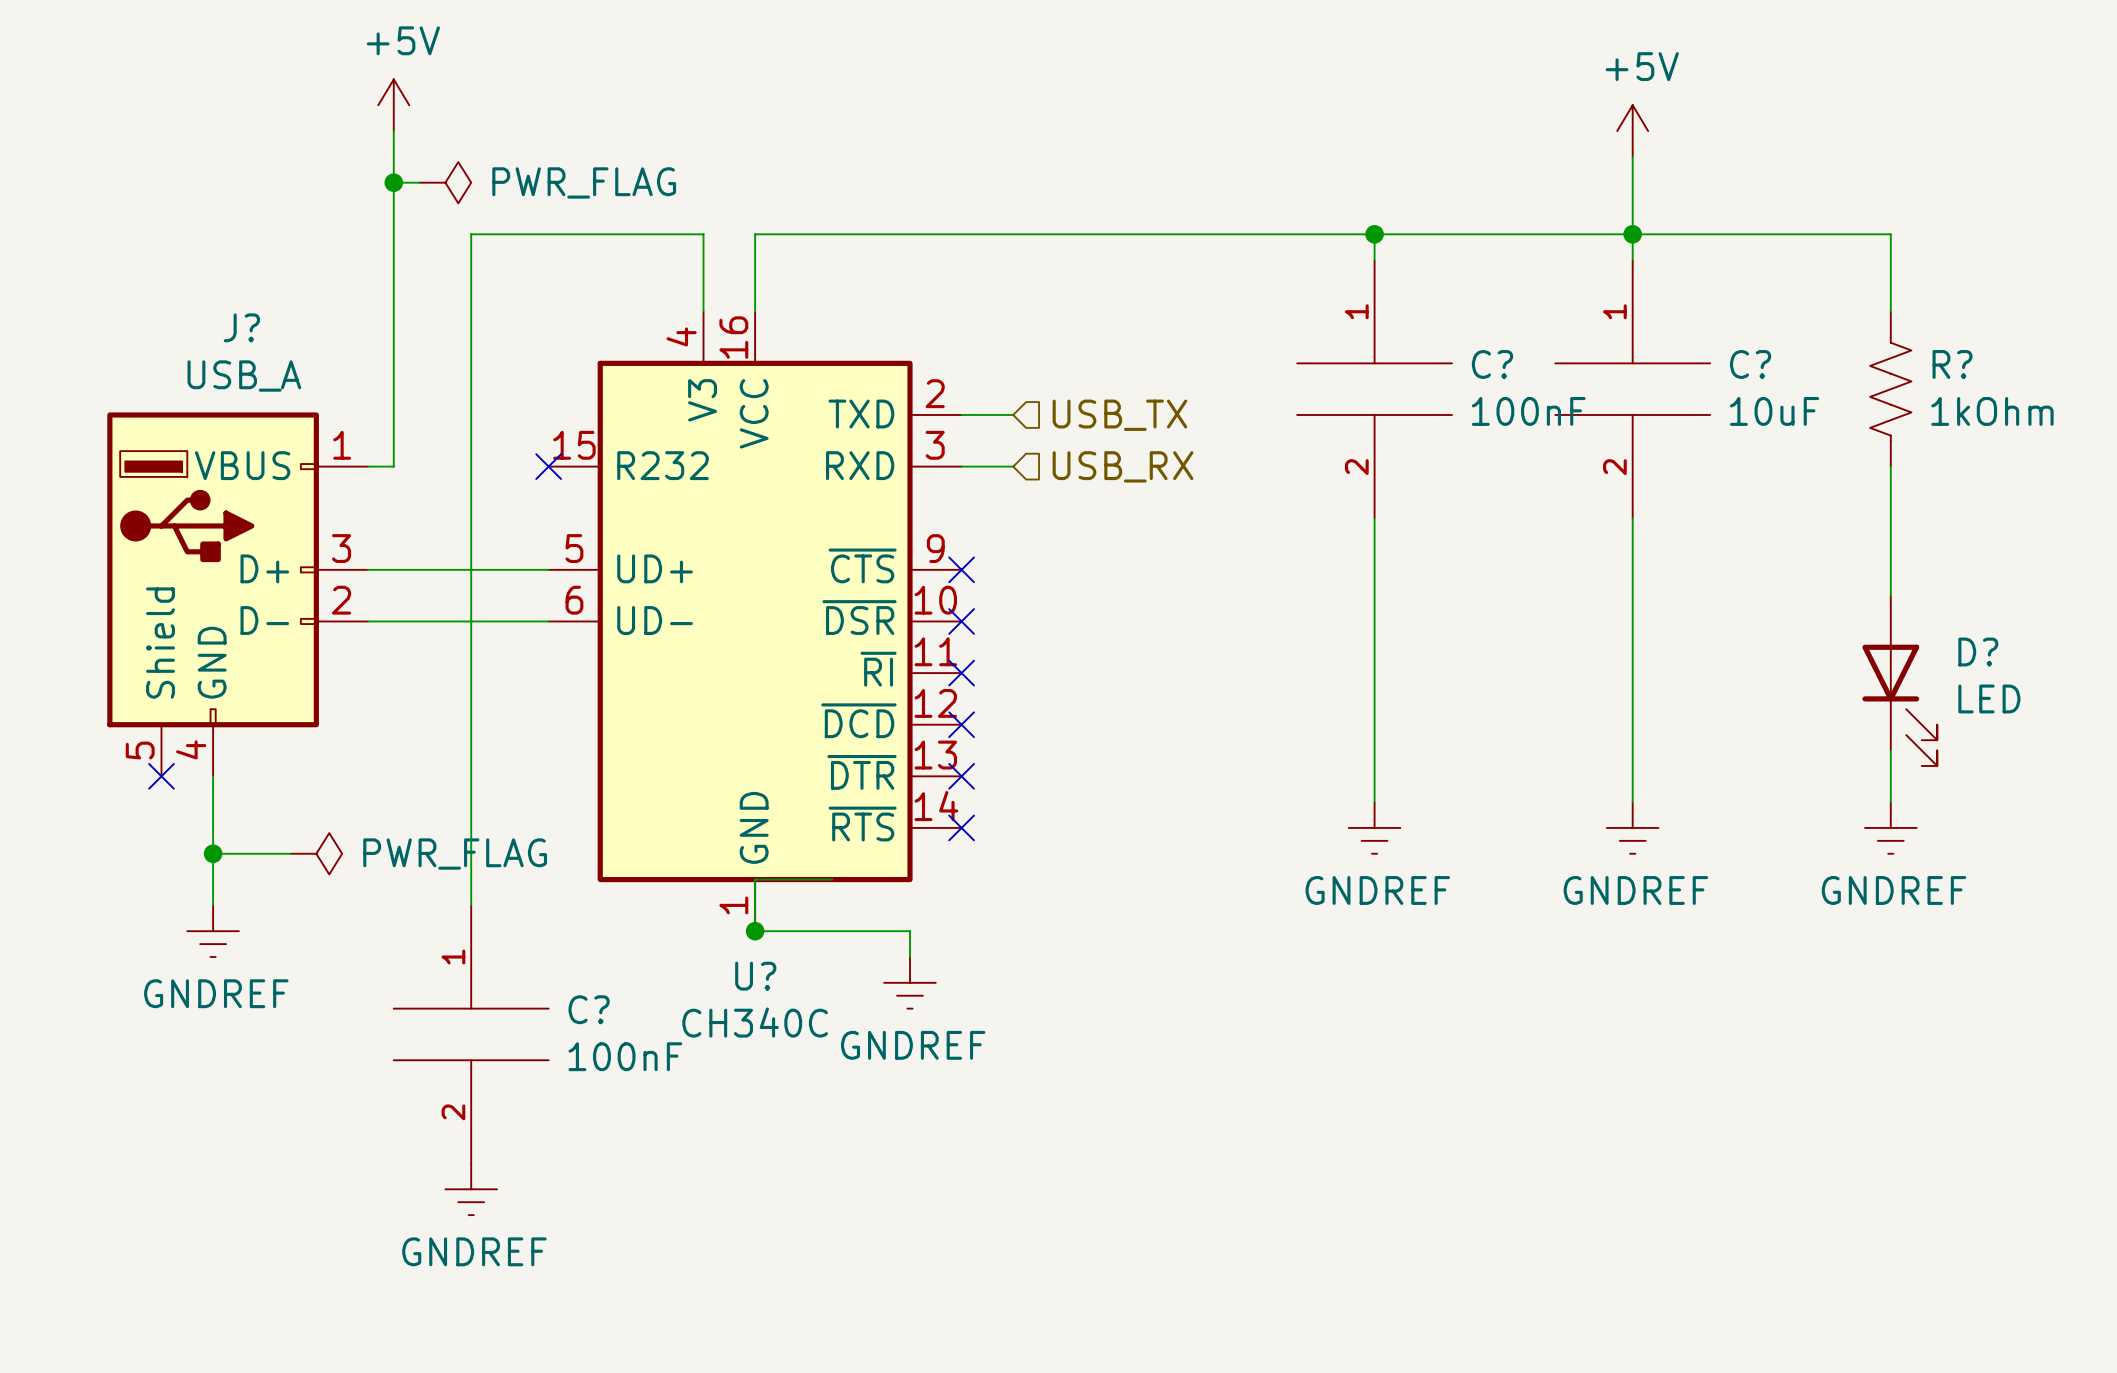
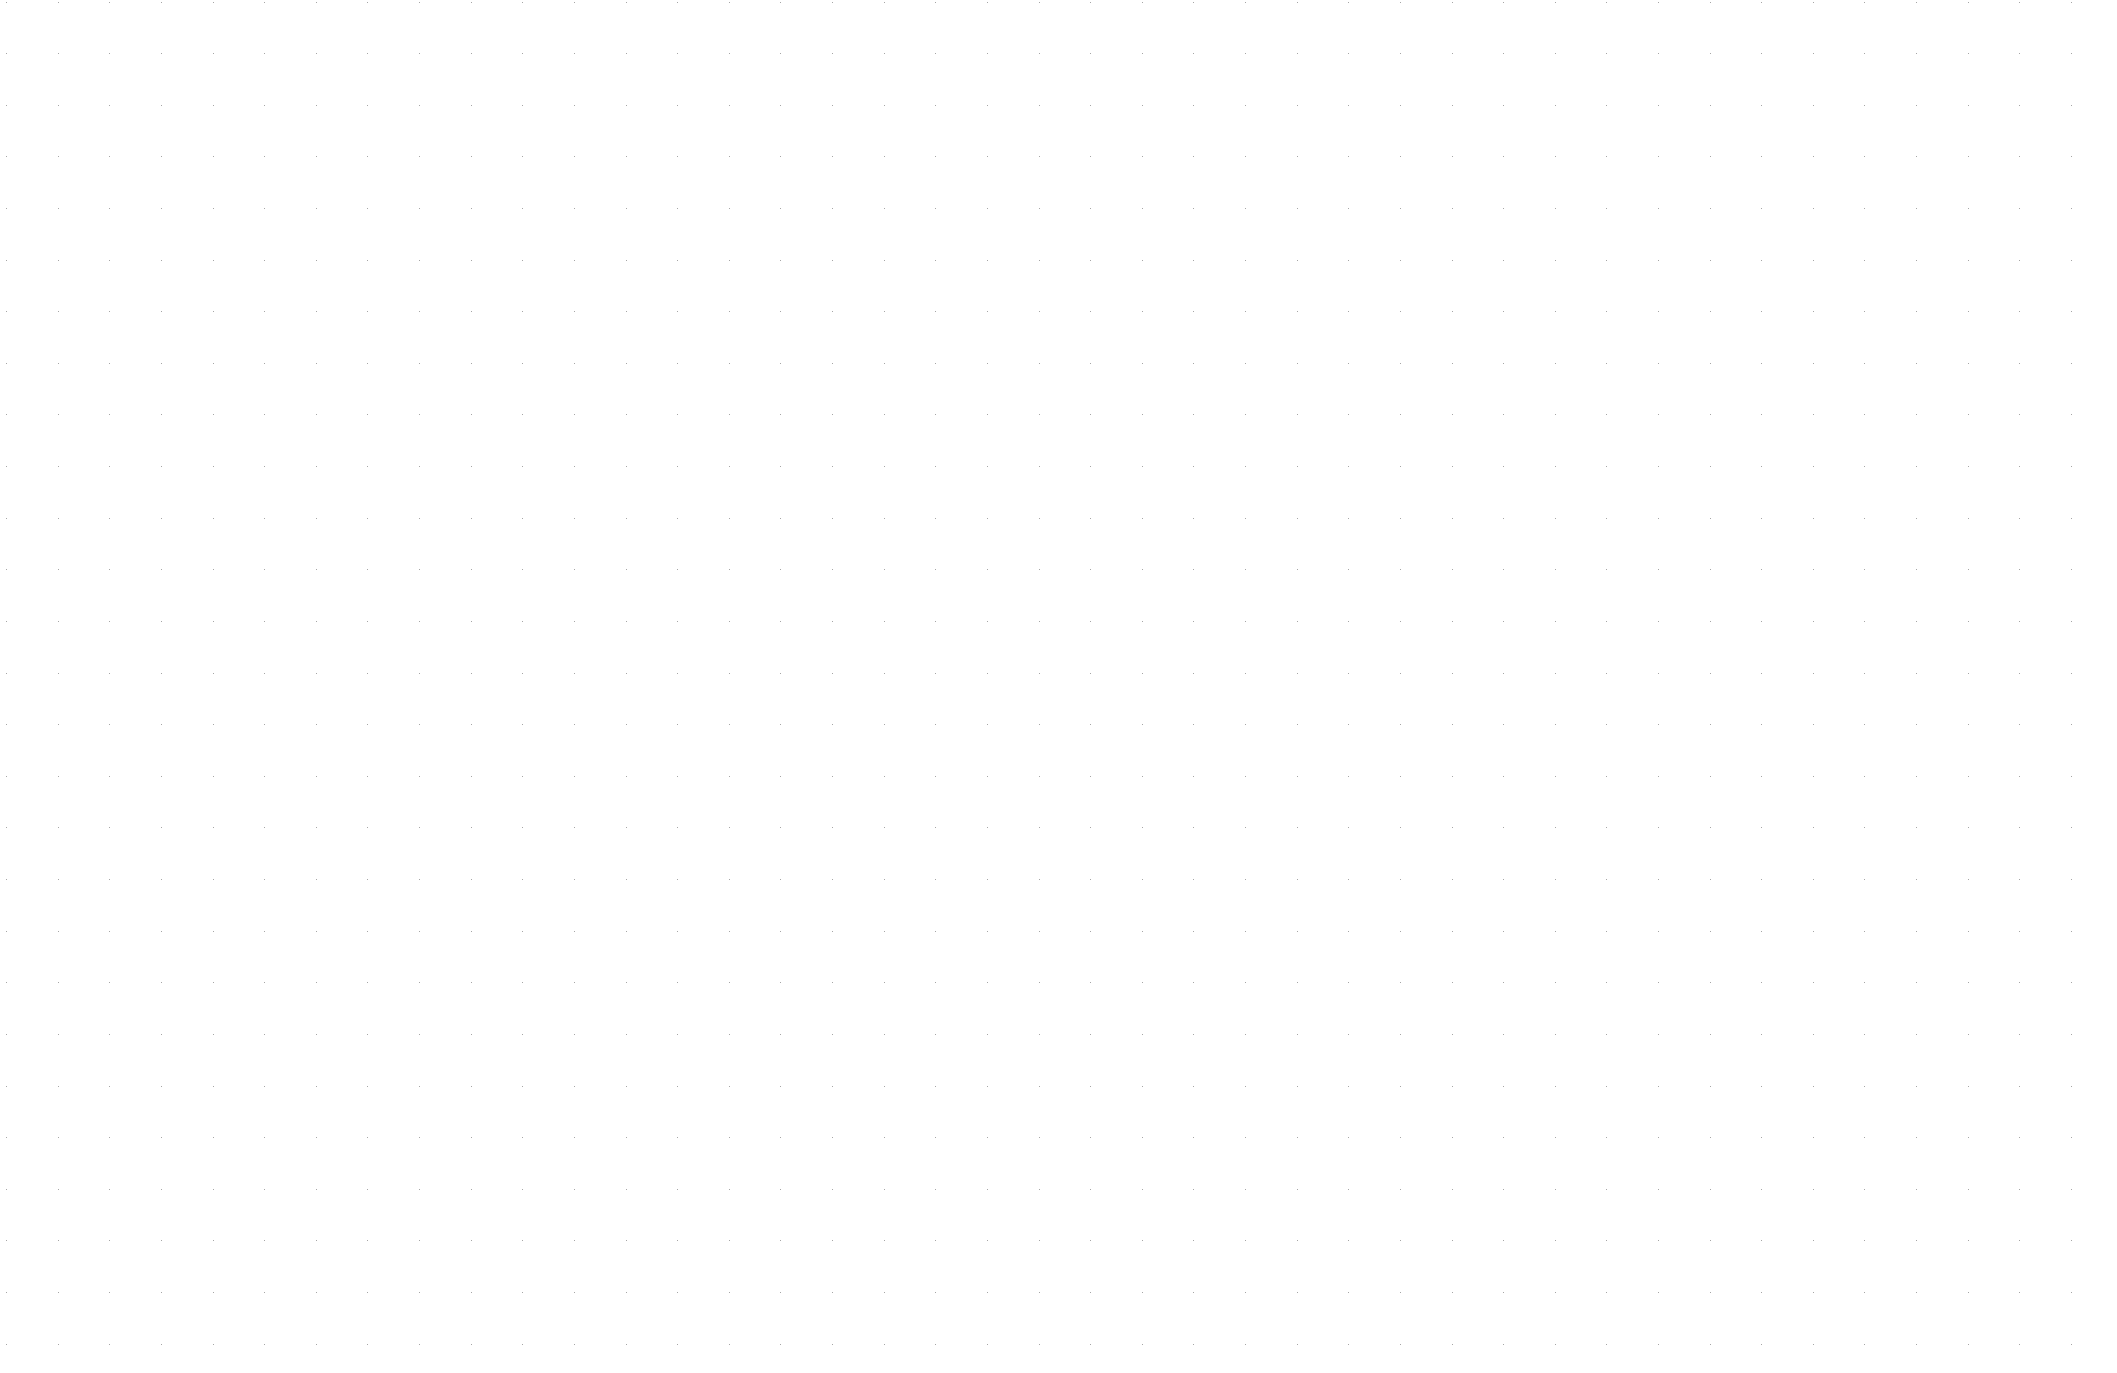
power symbol: +5V (393, 105) -> none
wire: (393, 131) (393, 466) (367, 466) -> none
power symbol: +5V (1632, 131) -> none
wire: (1632, 156) (1632, 260) -> none
wire: (393, 182) (419, 182) -> none
junction: (393, 182) -> none
power symbol: PWR_FLAG (445, 182) -> none
wire: (1374, 234) (1374, 260) -> none
junction: (1374, 234) -> none
junction: (1632, 234) -> none
wire: (703, 311) (703, 234) (471, 234) (471, 905) -> none
wire: (755, 311) (755, 234) (1890, 234) (1890, 311) -> none
C?: 100nF (1374, 389) -> none
C?: 10uF (1632, 389) -> none
R?: 1kOhm (1890, 389) -> none
wire: (961, 414) (1013, 414) -> none
hierarchical label: USB_TX (1119, 415) -> none
no-connect mark: (548, 466) -> none
wire: (961, 466) (1013, 466) -> none
hierarchical label: USB_RX (1123, 466) -> none
wire: (1890, 466) (1890, 595) -> none
wire: (1374, 518) (1374, 802) -> none
wire: (1632, 518) (1632, 802) -> none
wire: (367, 569) (548, 569) -> none
no-connect mark: (961, 569) -> none
J?: USB_A (237, 594) -> none
wire: (367, 621) (548, 621) -> none
U?: CH340C (755, 621) -> none
no-connect mark: (961, 621) -> none
no-connect mark: (961, 673) -> none
D?: LED (1899, 680) -> none
no-connect mark: (961, 724) -> none
wire: (1890, 750) (1890, 802) -> none
no-connect mark: (161, 776) -> none
wire: (213, 776) (213, 905) -> none
no-connect mark: (961, 776) -> none
no-connect mark: (961, 827) -> none
power symbol: GNDREF (1374, 827) -> none
power symbol: GNDREF (1632, 827) -> none
power symbol: GNDREF (1890, 827) -> none
wire: (213, 853) (290, 853) -> none
junction: (213, 853) -> none
power symbol: PWR_FLAG (316, 853) -> none
wire: (832, 879) (755, 879) (755, 931) (909, 931) (909, 957) -> none
power symbol: GNDREF (213, 931) -> none
junction: (755, 931) -> none
power symbol: GNDREF (909, 982) -> none
C?: 100nF (471, 1034) -> none
power symbol: GNDREF (471, 1189) -> none

